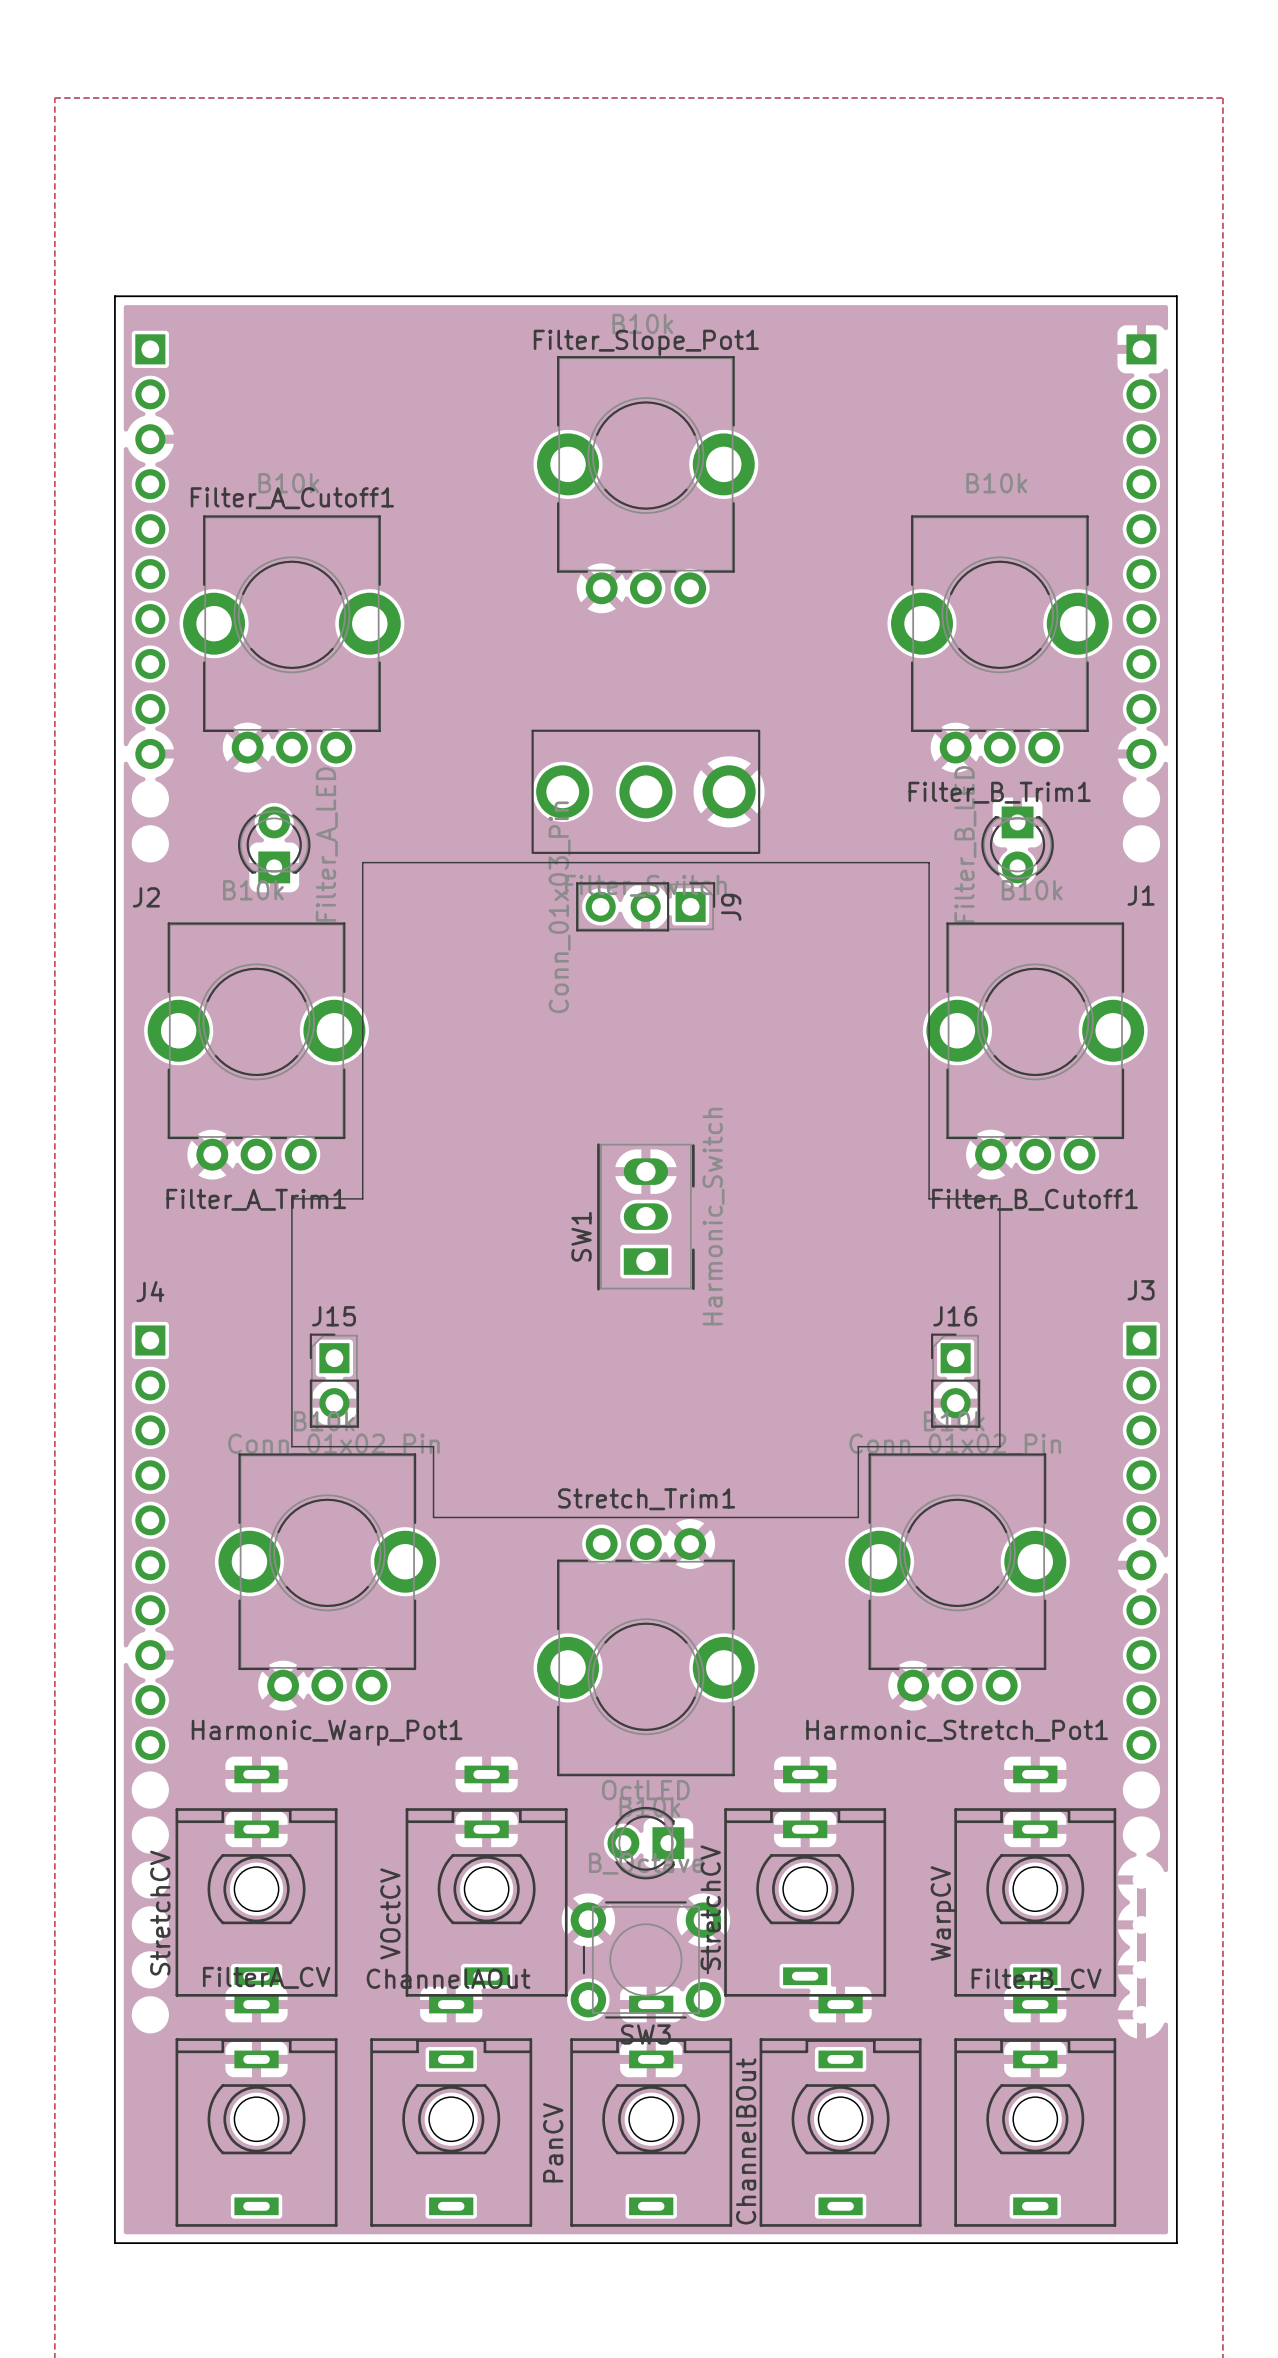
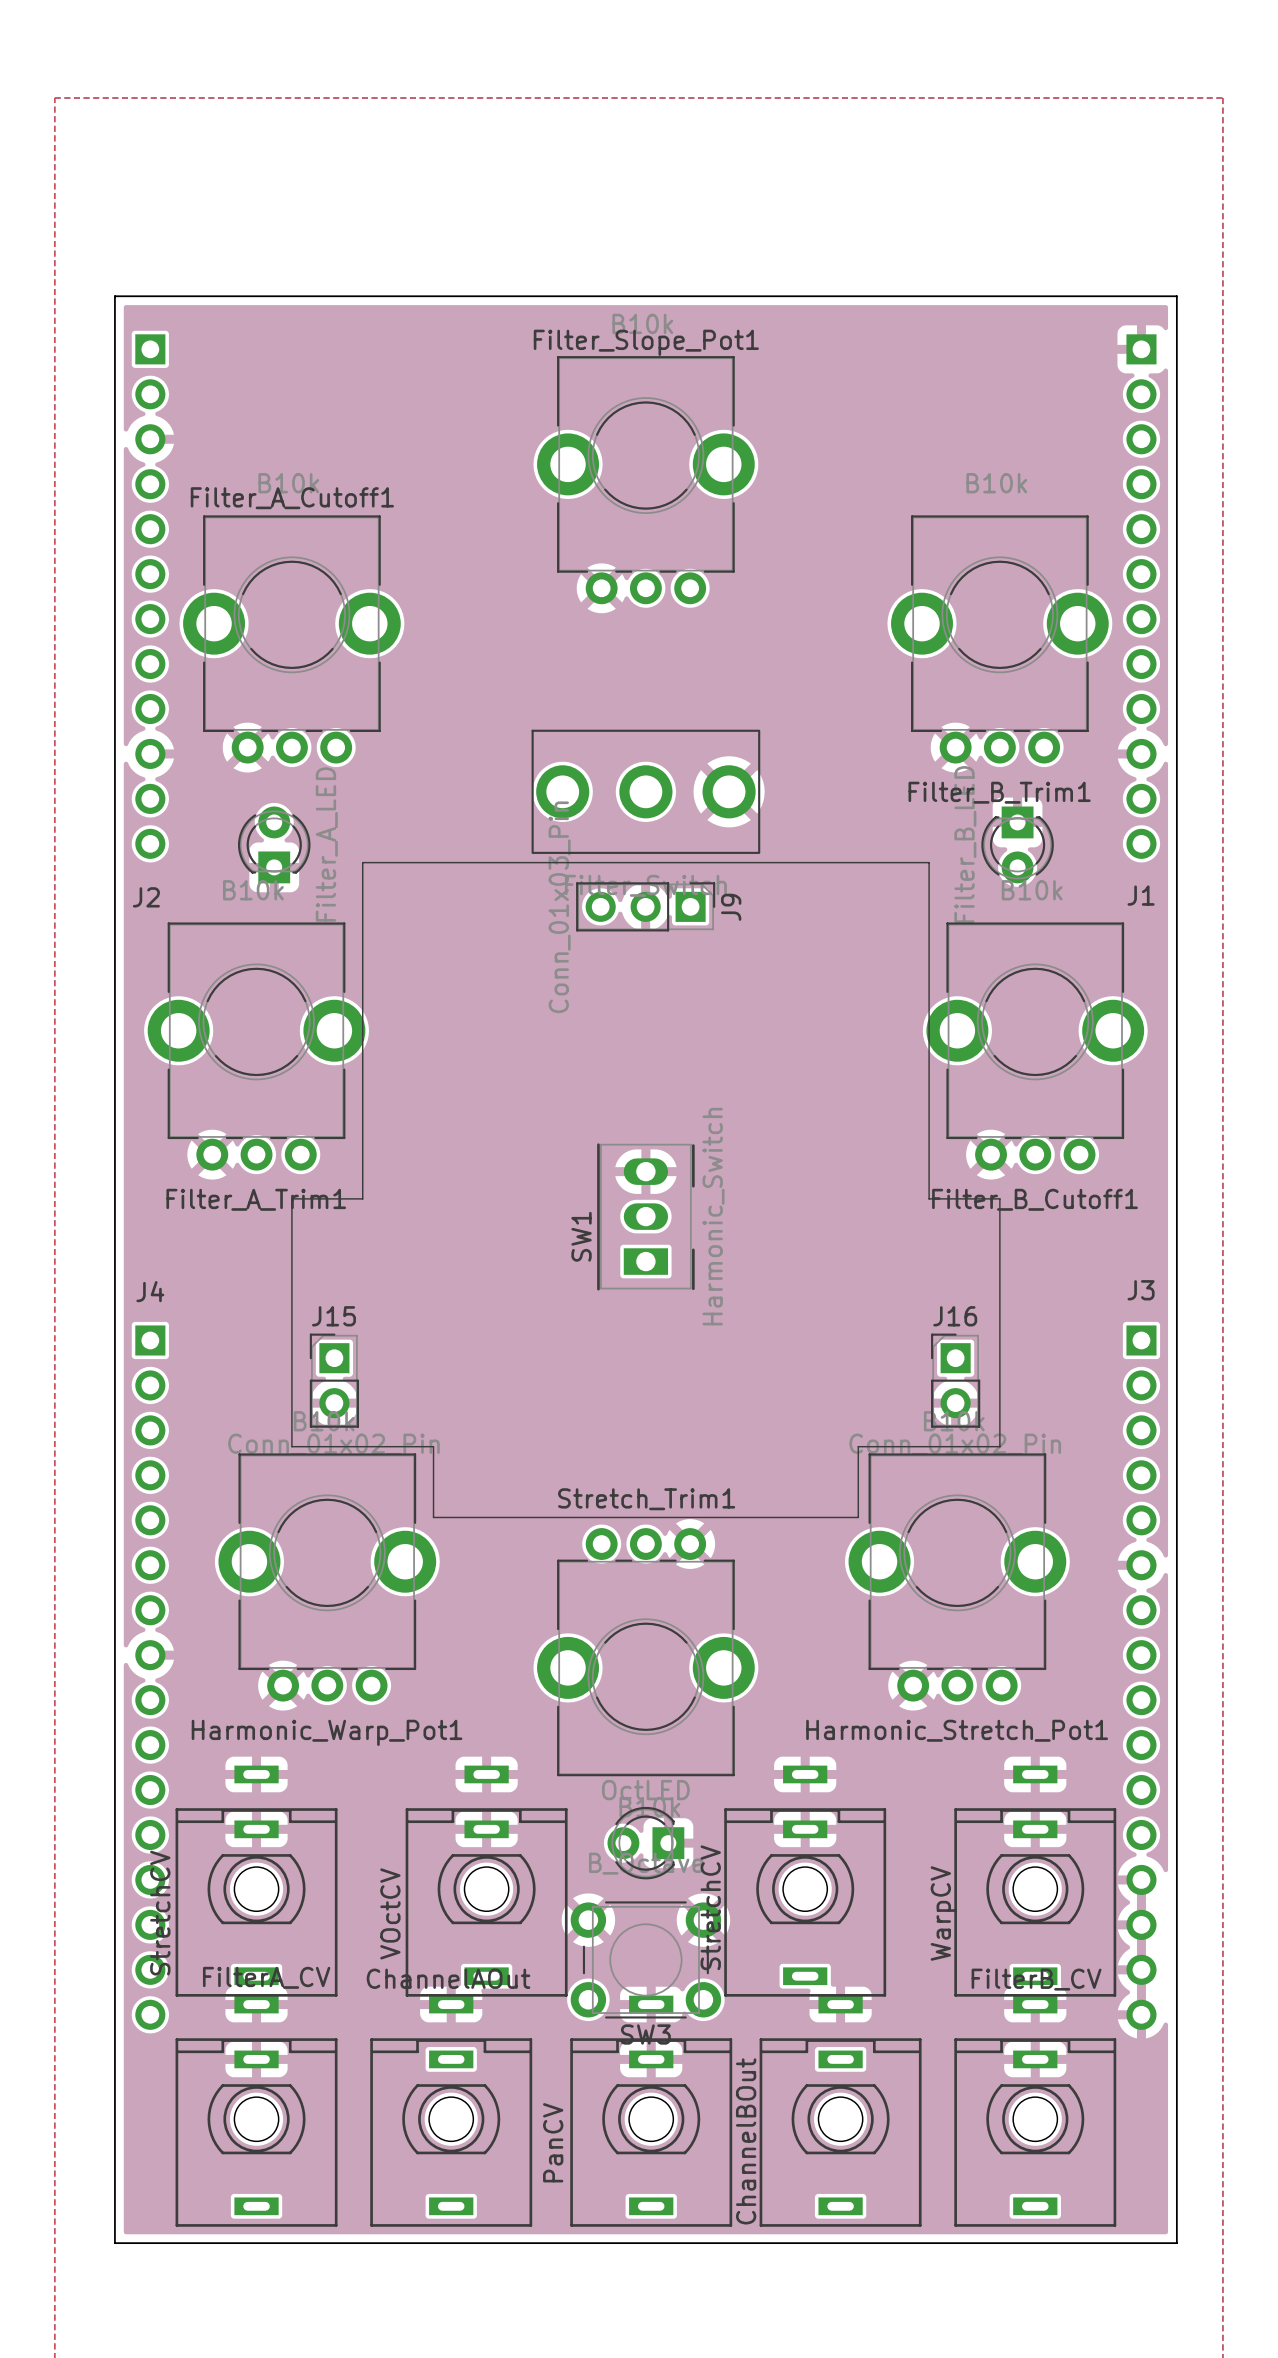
part: none -> (150, 596)
part: none -> (1141, 596)
part: none -> (150, 1677)
part: none -> (1141, 1677)

